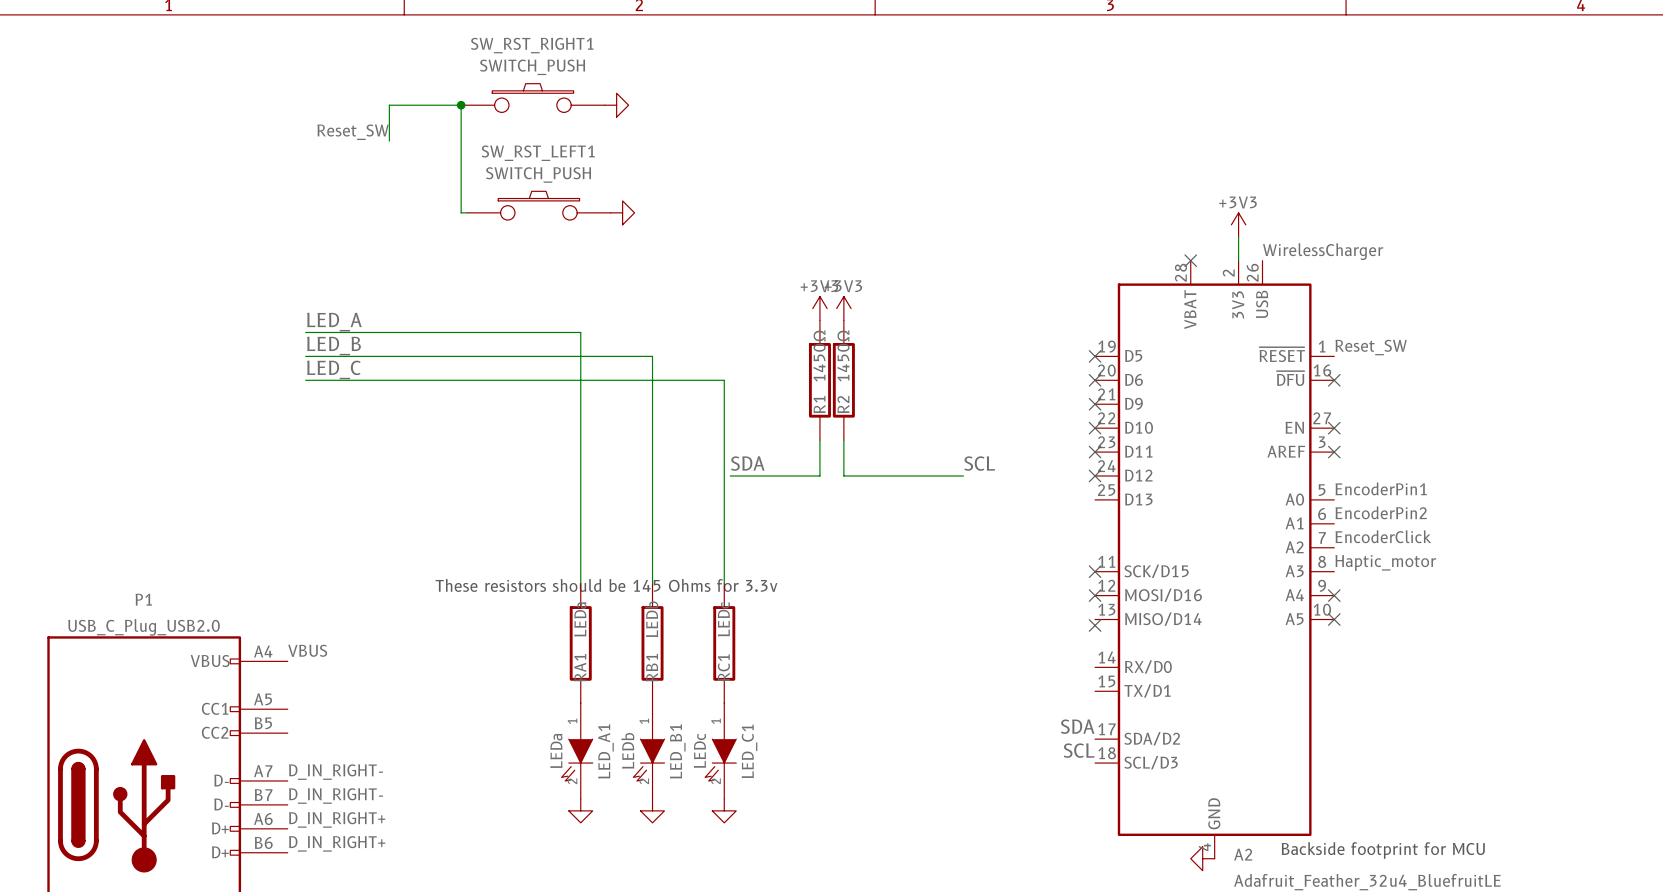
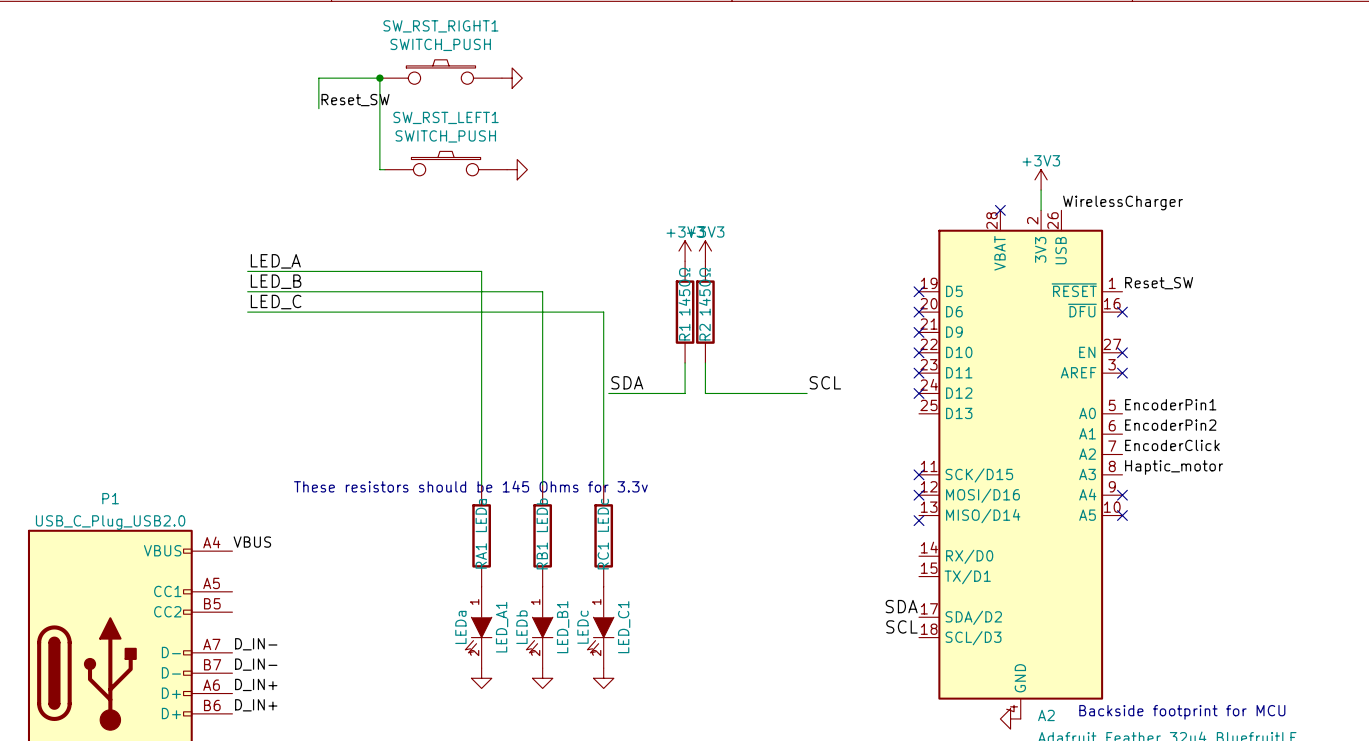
label position: Reset_SW (353, 132) -> Reset_SW (355, 100)
label: D_IN_RIGHT- (335, 772) -> D_IN- (256, 644)
label: D_IN_RIGHT- (335, 796) -> D_IN- (256, 664)
label: D_IN_RIGHT+ (337, 819) -> D_IN+ (256, 684)
label: D_IN_RIGHT+ (337, 843) -> D_IN+ (256, 705)

